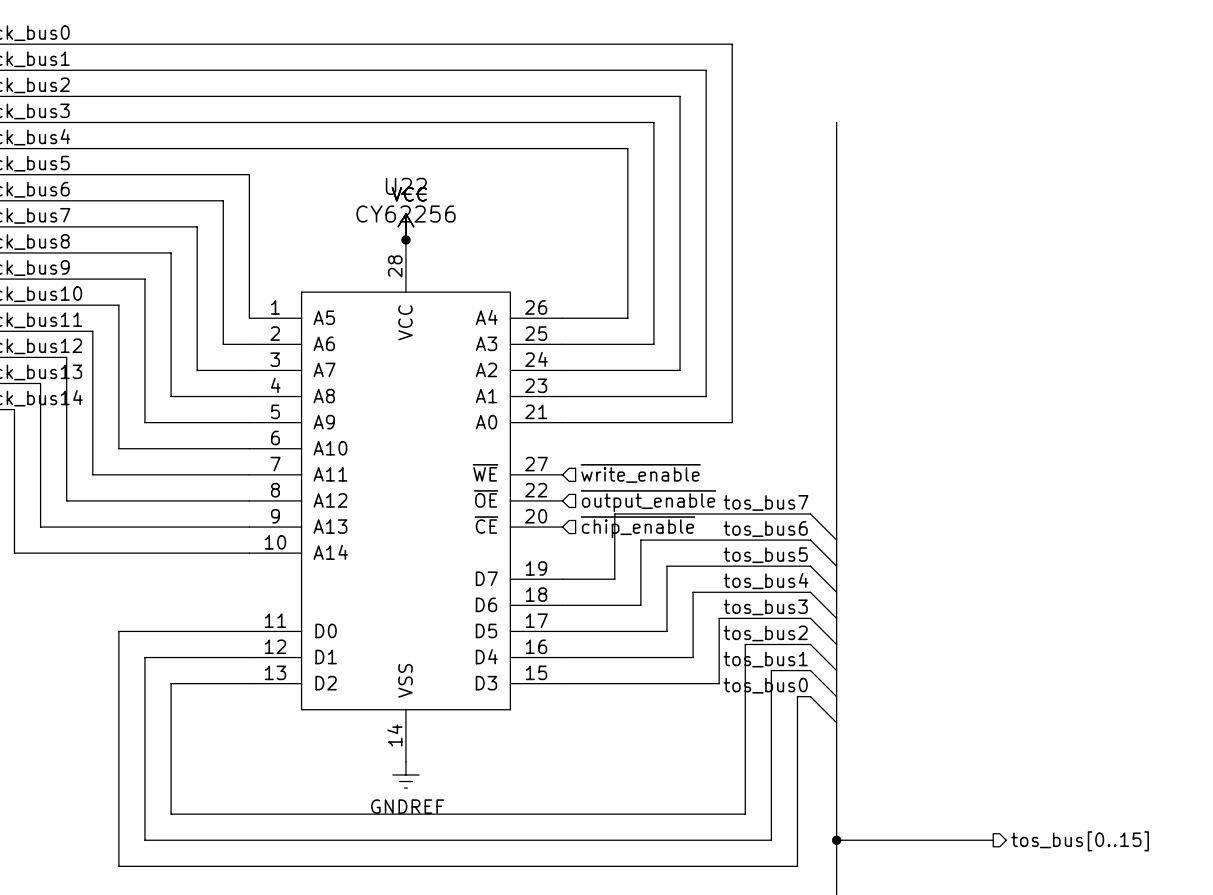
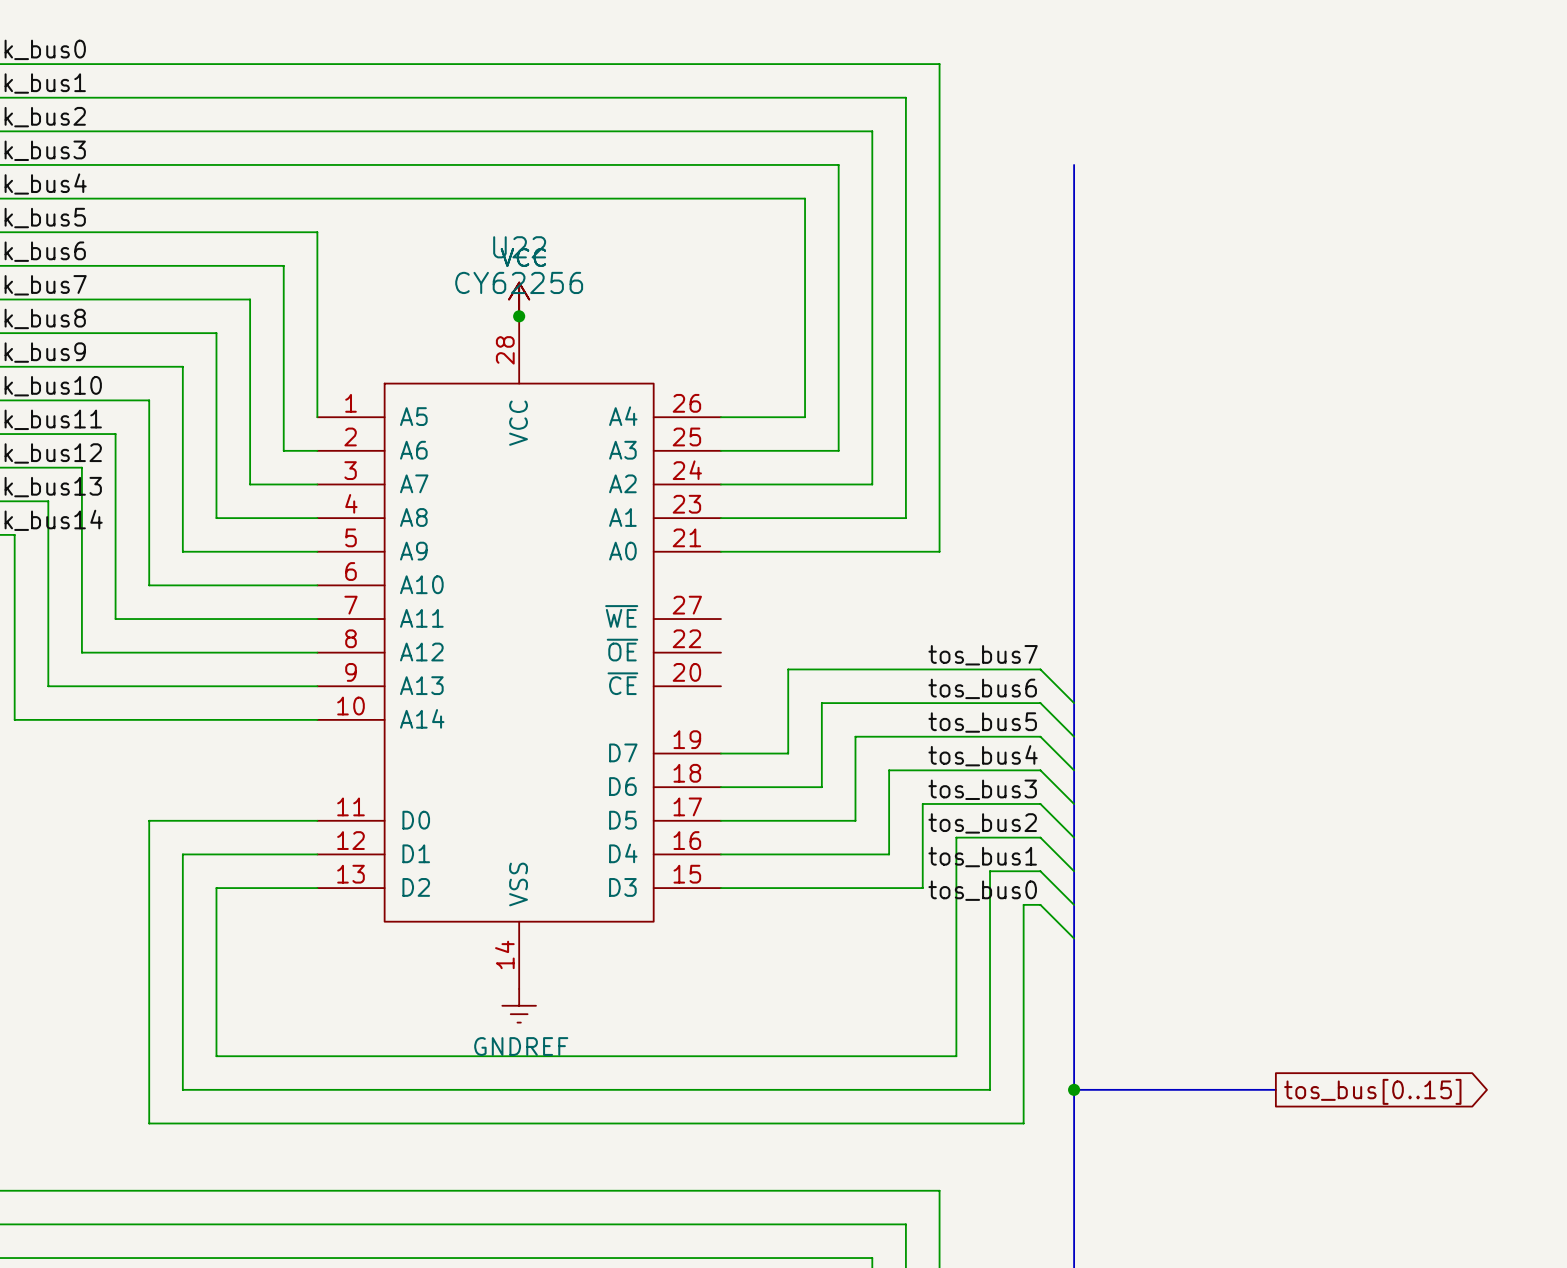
hierarchical label: ~{write_enable} (640, 473) -> none
hierarchical label: ~{output_enable} (648, 501) -> none
hierarchical label: ~{chip_enable} (637, 527) -> none
global label: none -> tos_bus[0..15] (1372, 1091)
hierarchical label: tos_bus[0..15] (1080, 841) -> none

